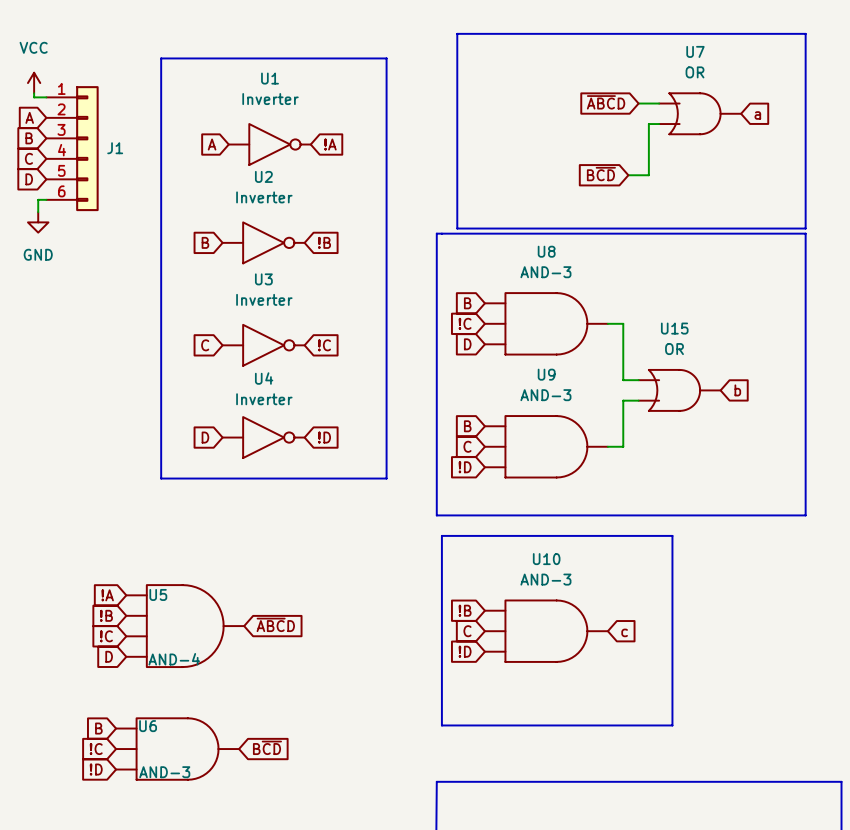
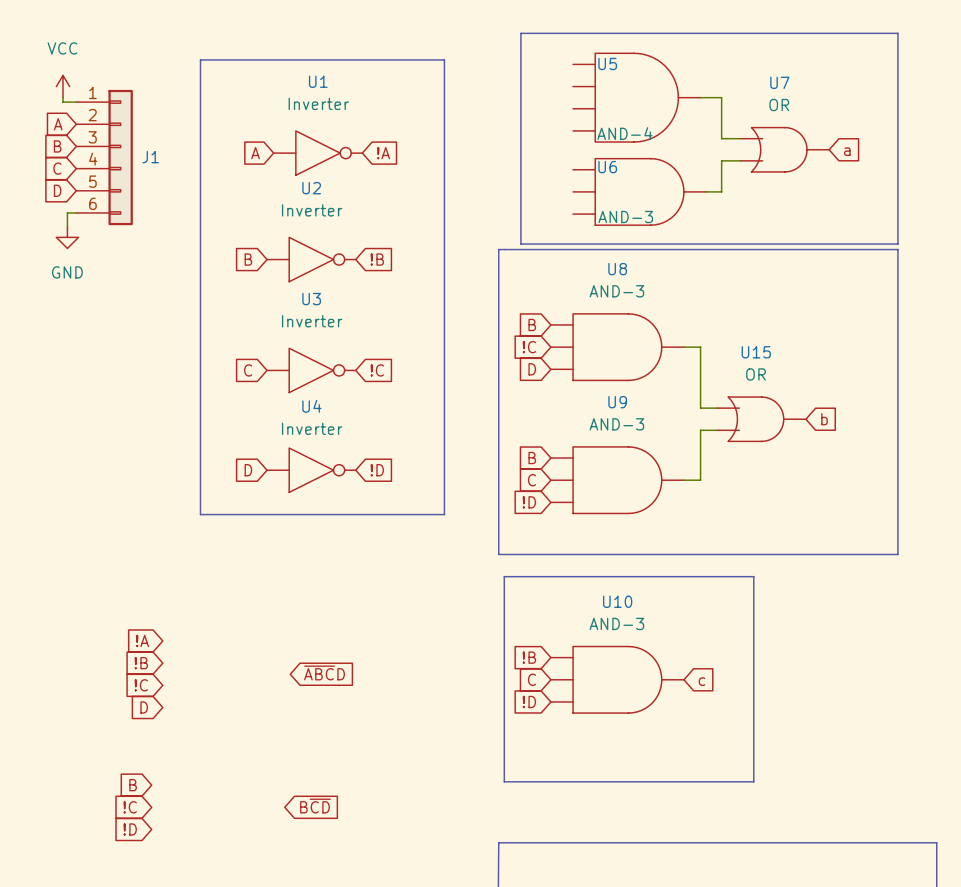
wire: none -> (700, 97) (721, 97) (721, 138) (740, 138)
global label: ~{ABC}D (606, 102) -> none
wire: (638, 103) (659, 103) -> none
U7 position: (700, 113) -> (784, 149)
global label position: a (757, 115) -> a (847, 151)
wire: (659, 124) (648, 124) (648, 175) (628, 175) -> none
wire: none -> (740, 160) (721, 160) (721, 191) (706, 191)
global label: B~{CD} (601, 174) -> none
U5 position: (185, 626) -> (636, 97)
U6 position: (177, 749) -> (639, 191)

